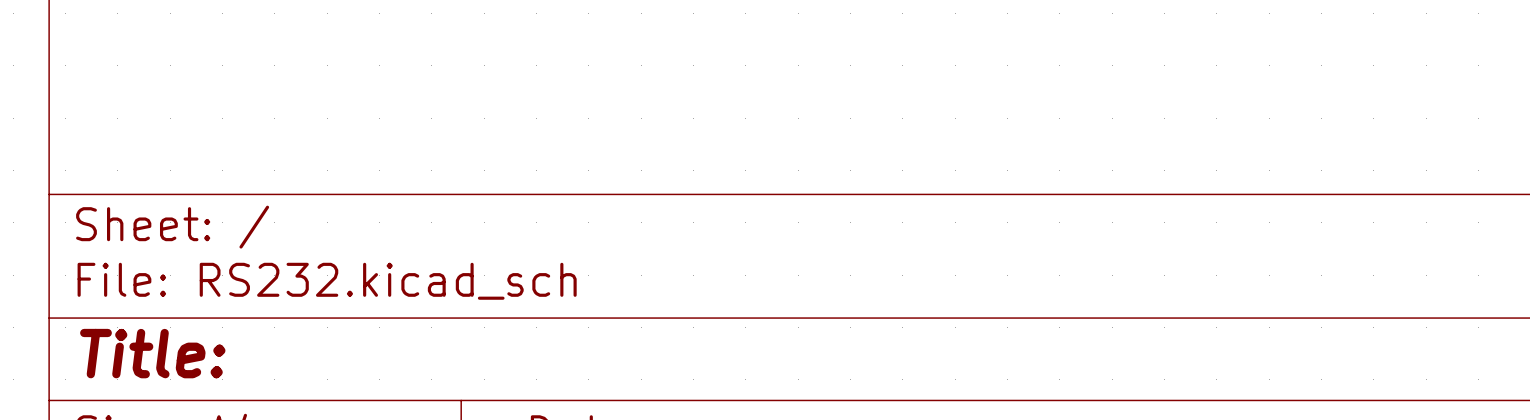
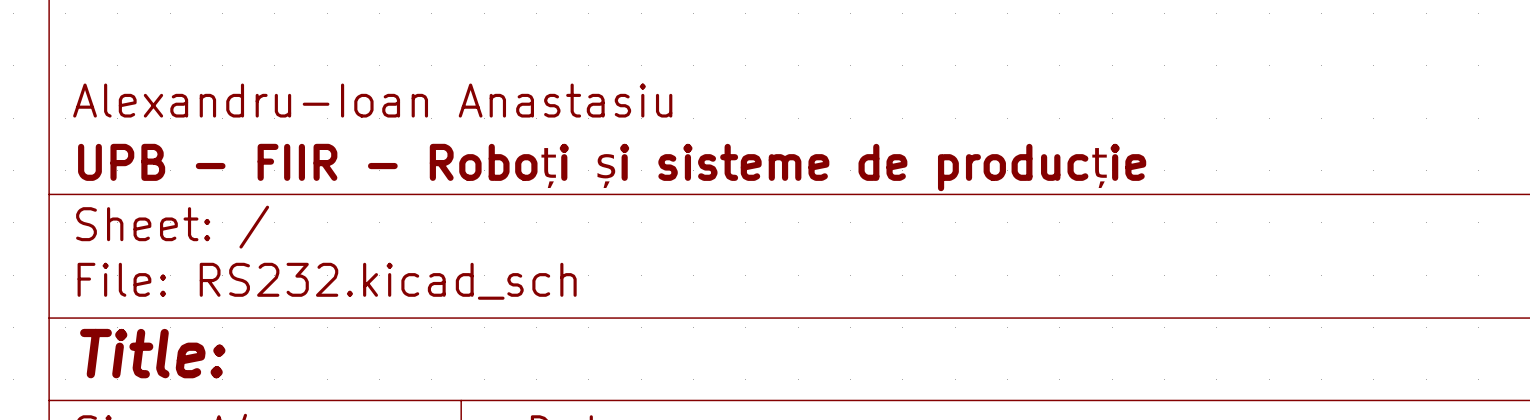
title block: none -> Alexandru-Ioan Anastasiu (372, 100)
title block: none -> UPB - FIIR - Roboți și sisteme de producție (612, 167)

